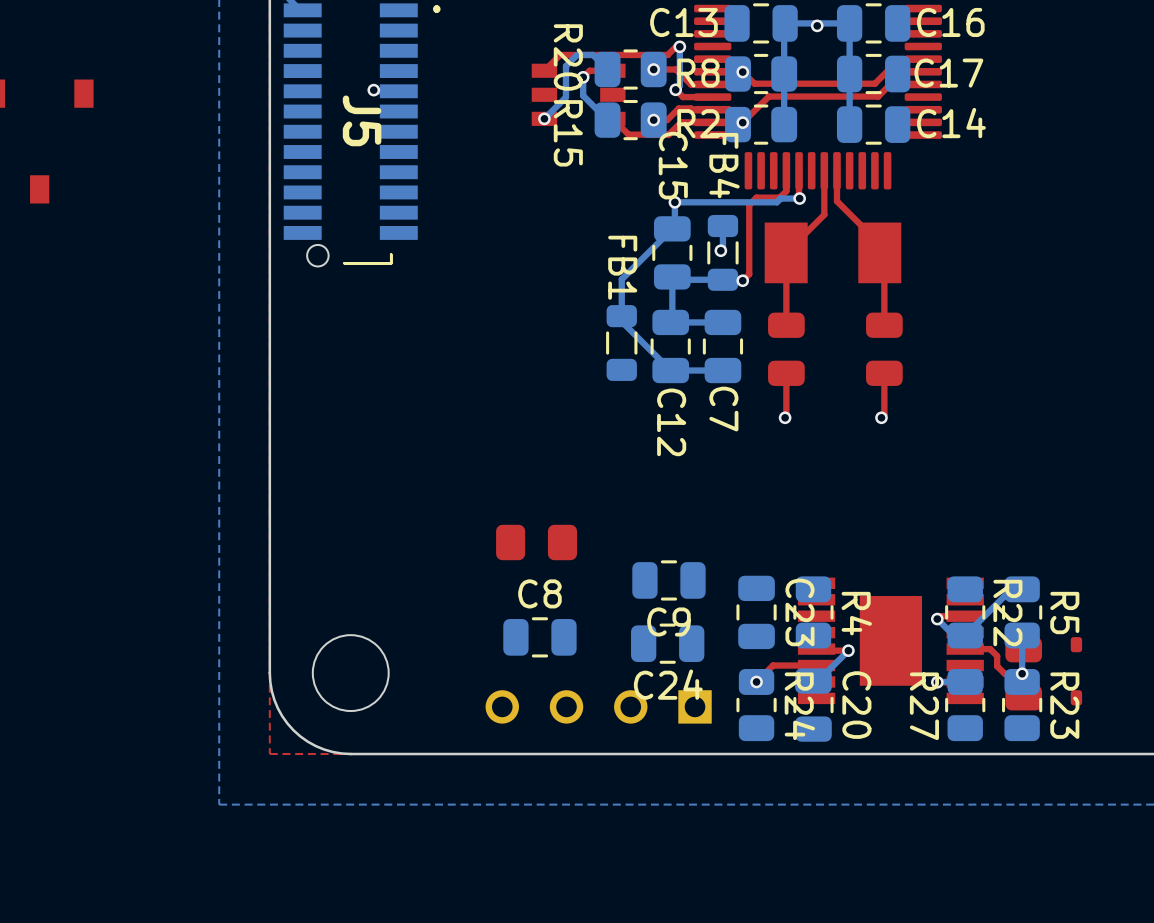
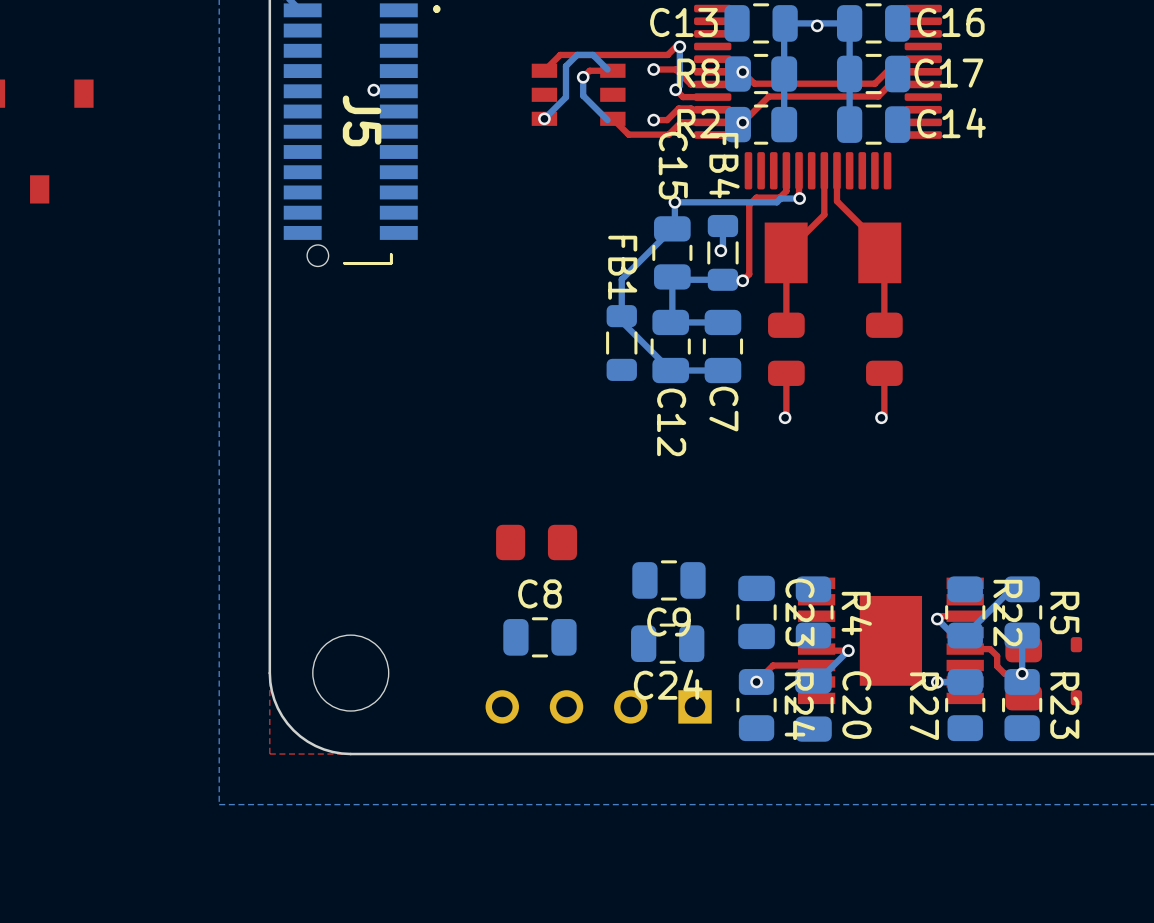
R20: (630, 69) -> none
R15: (630, 120) -> none

